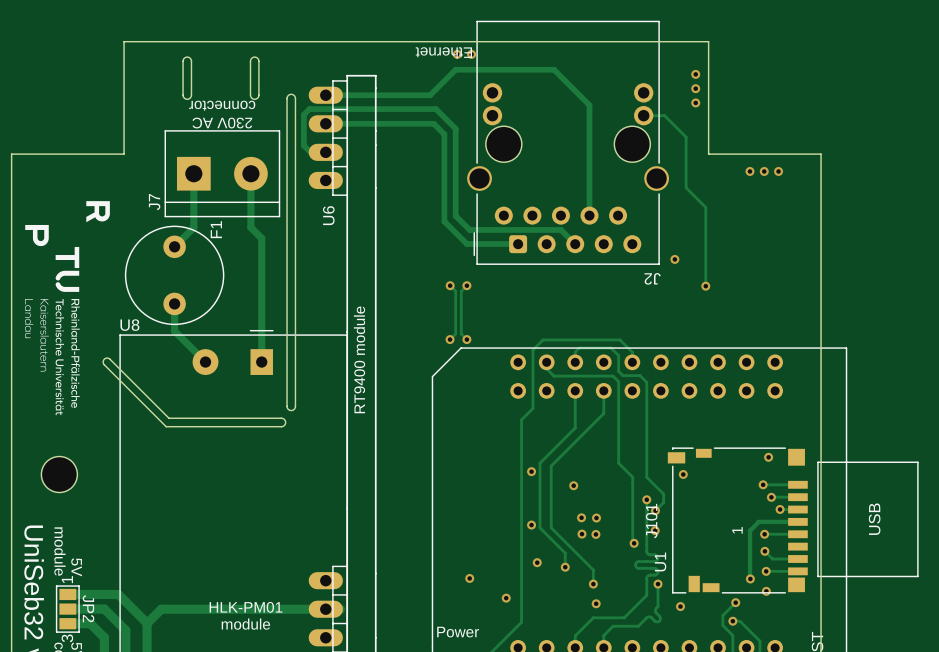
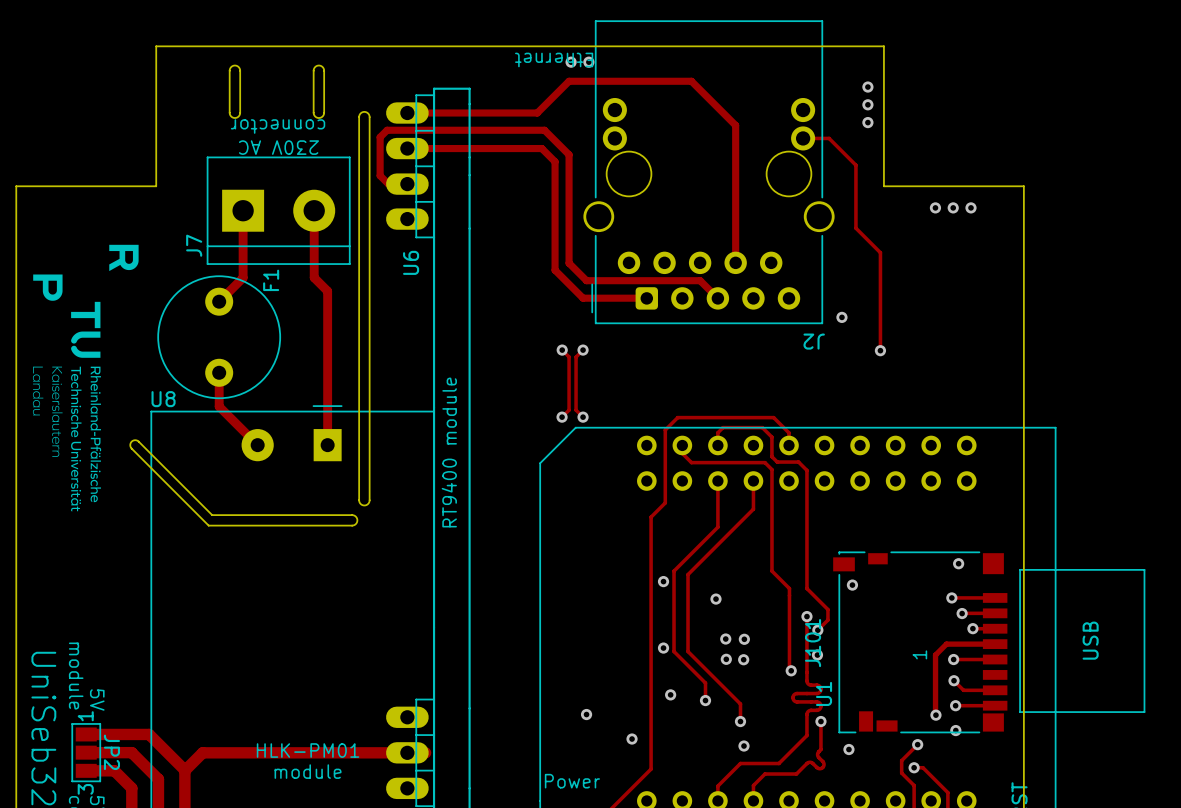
part: (59, 474) -> none

